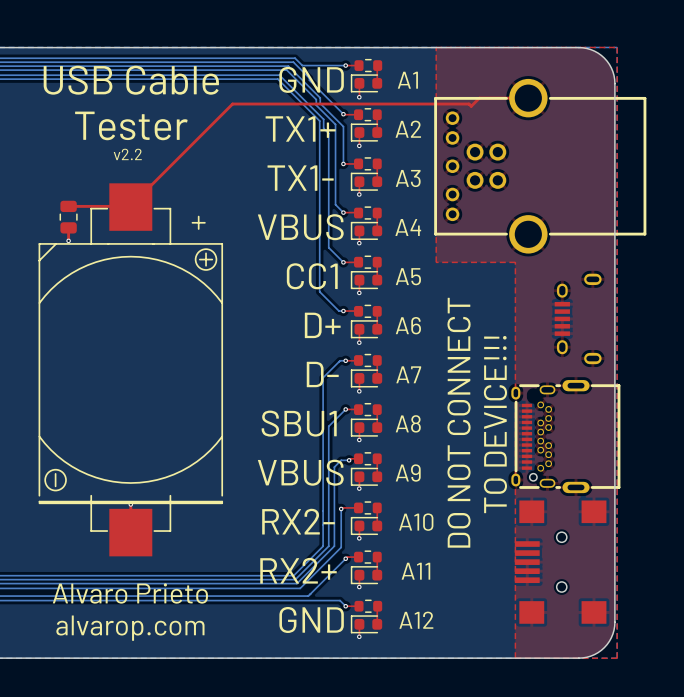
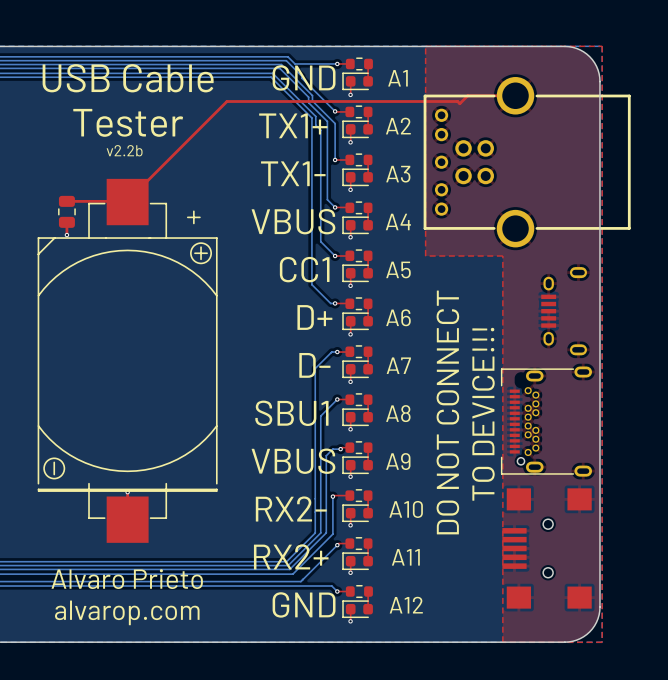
text: v2.2 (127, 154) -> v2.2b (124, 150)
part footprint: [511, 380, 621, 494] -> [501, 366, 593, 477]

